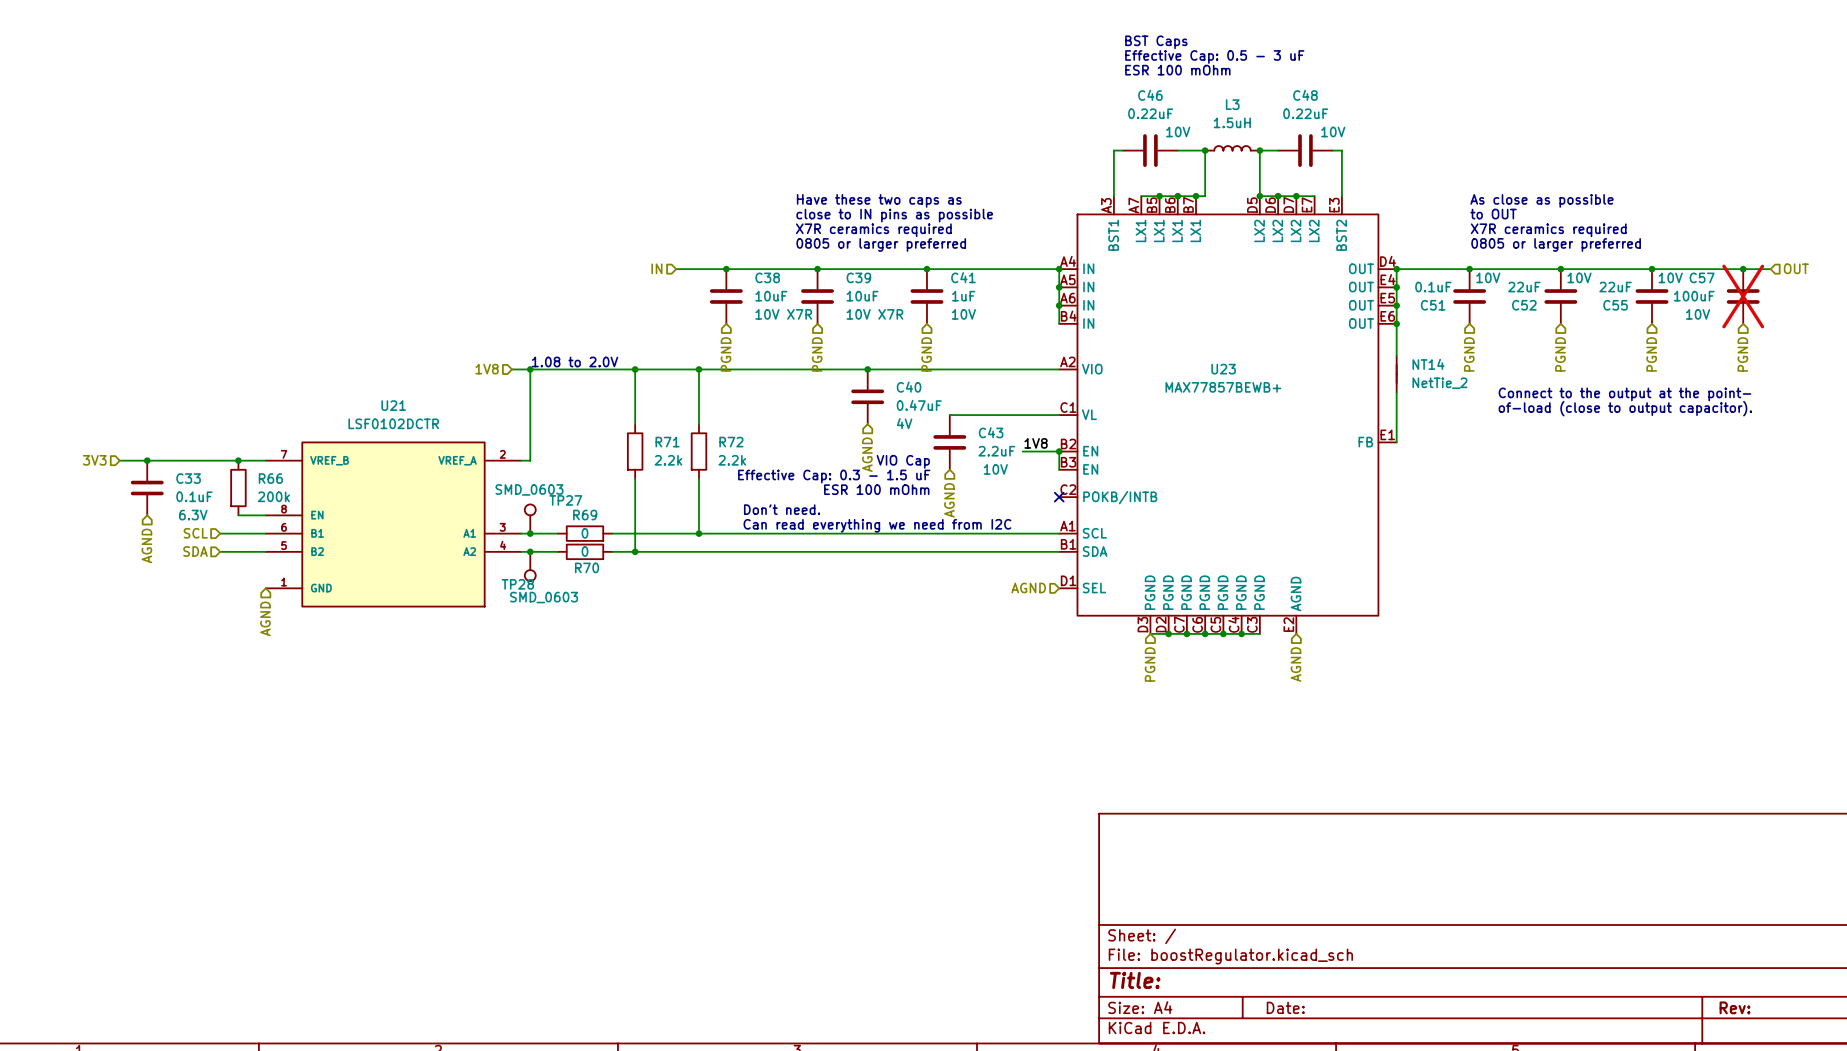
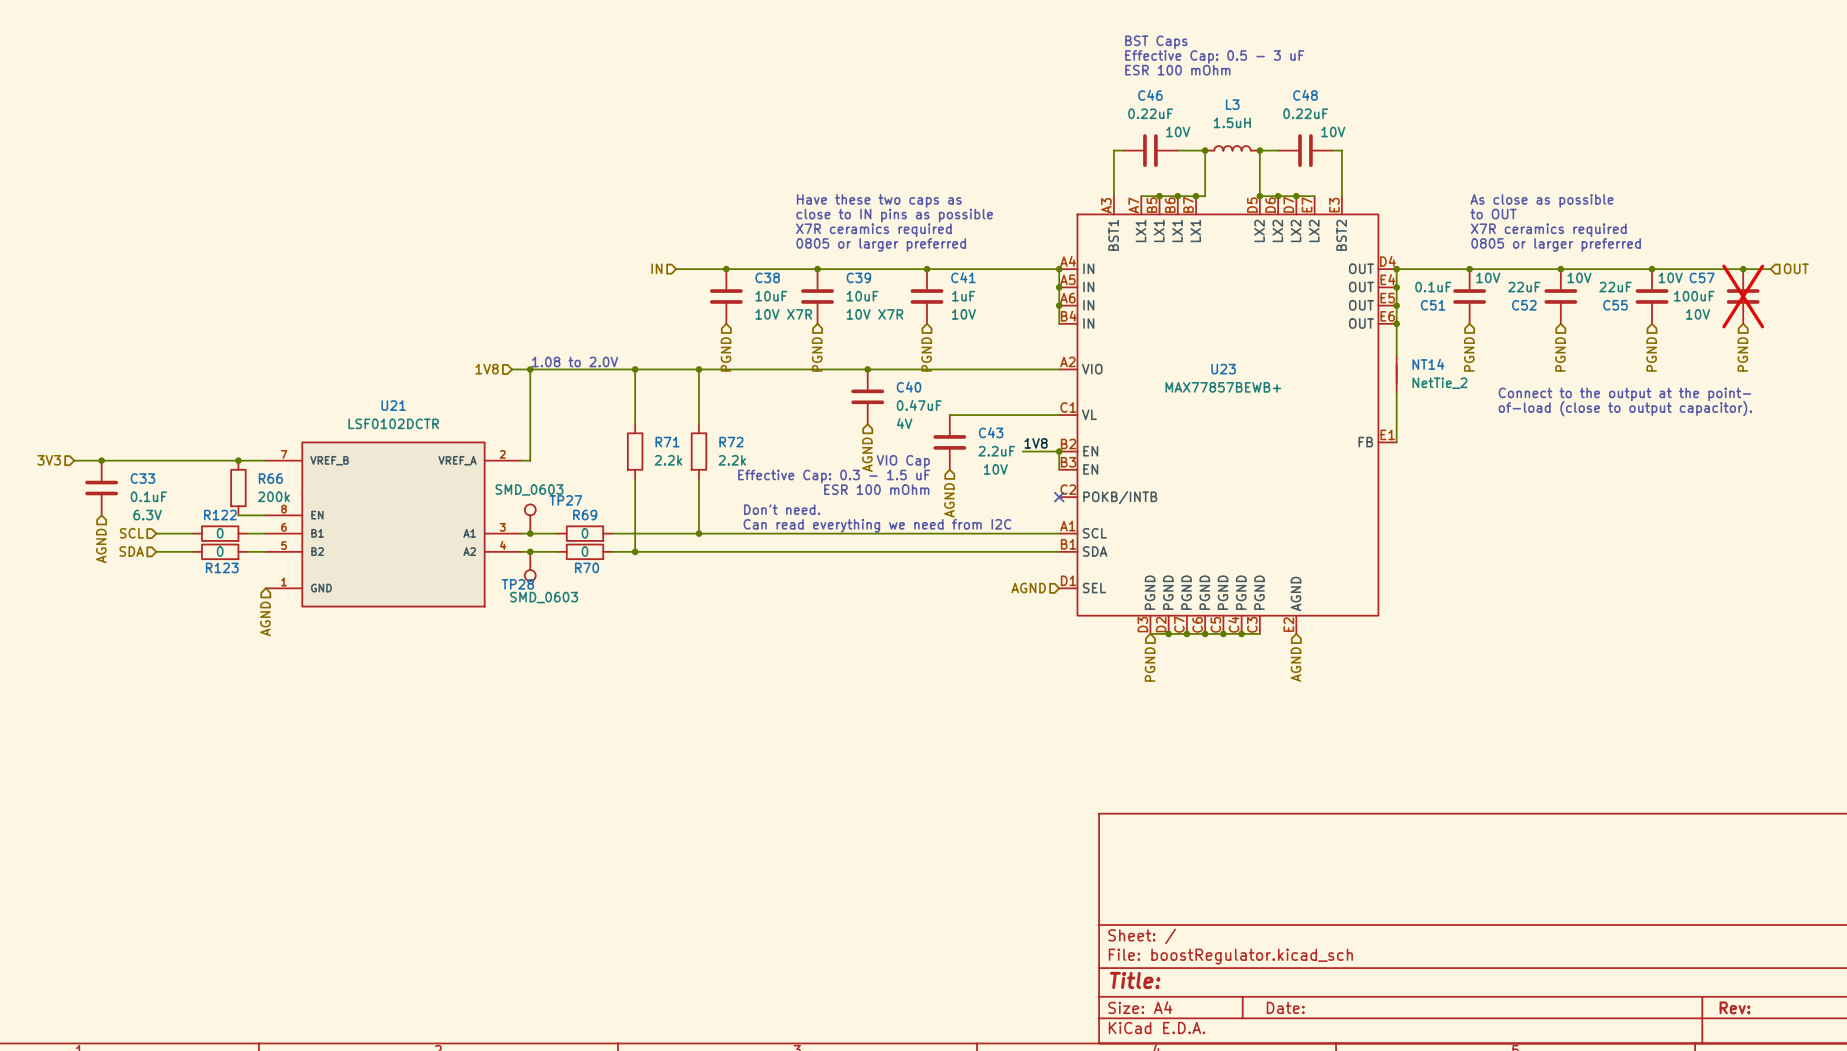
wire: none -> (74, 460) (119, 460)
hierarchical label position: 3V3 (94, 460) -> 3V3 (49, 460)
junction: none -> (101, 460)
junction: (147, 460) -> none
C33 position: (147, 488) -> (101, 488)
wire: none -> (156, 533) (192, 533)
hierarchical label position: SCL (195, 533) -> SCL (131, 533)
wire: (220, 533) (247, 533) -> none
R122: none -> 0 (220, 533)
hierarchical label position: AGND (146, 545) -> AGND (101, 545)
wire: none -> (156, 551) (192, 551)
hierarchical label position: SDA (195, 551) -> SDA (131, 551)
wire: (220, 551) (247, 551) -> none
R123: none -> 0 (220, 551)

